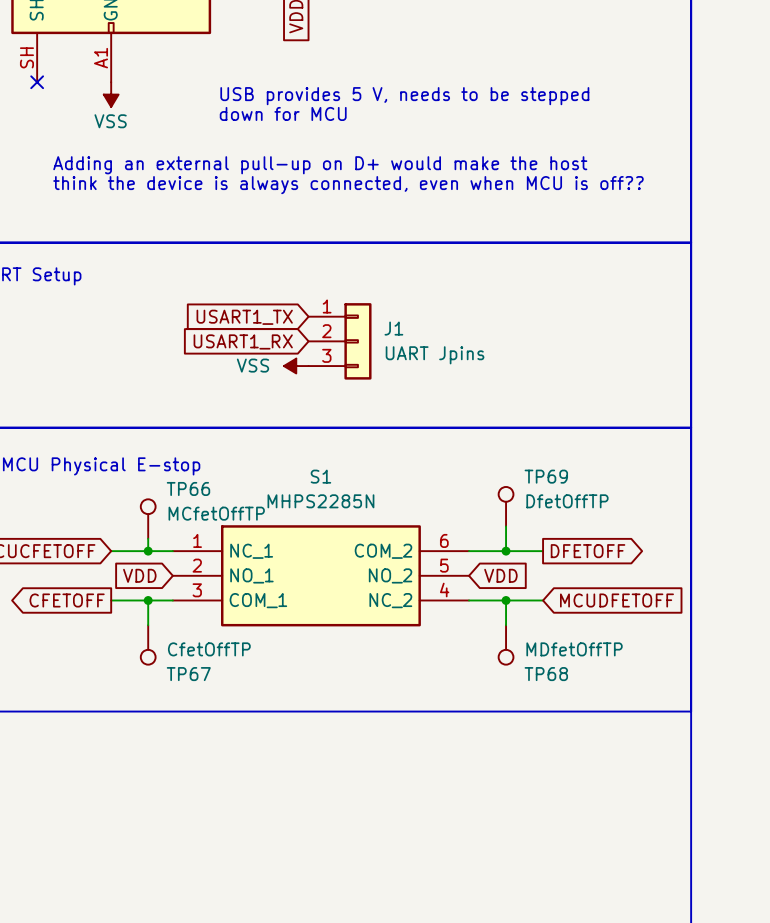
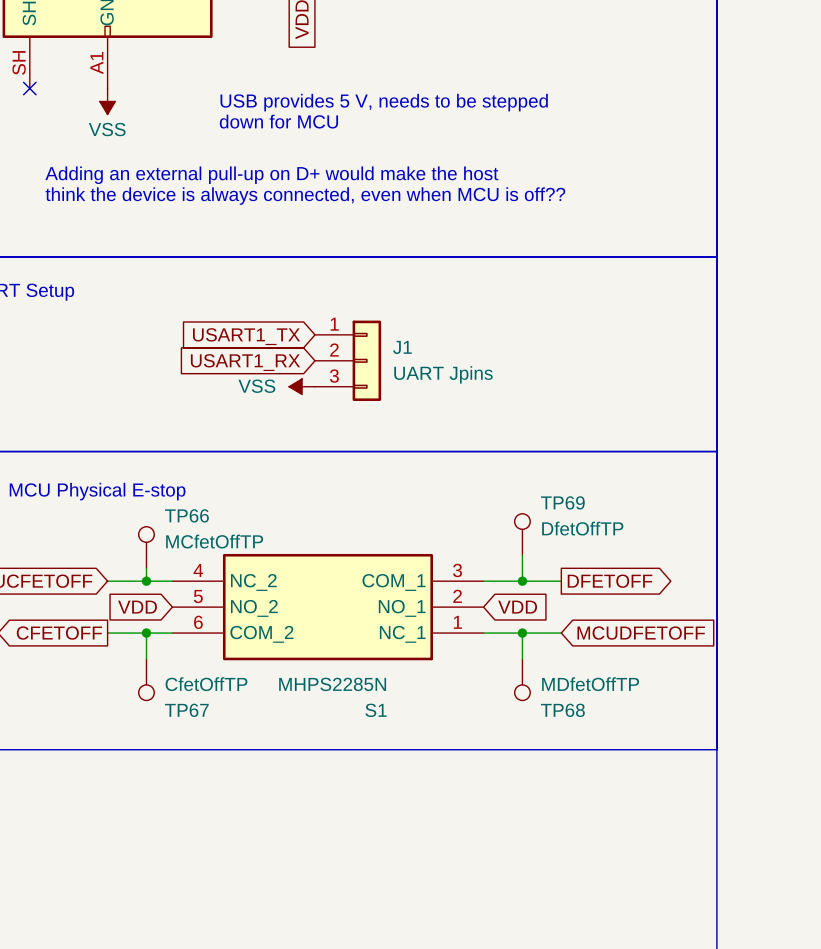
S1 name position: S1 (320, 476) -> S1 (376, 710)
S1 rotation: 0° (320, 575) -> 180° (327, 607)

